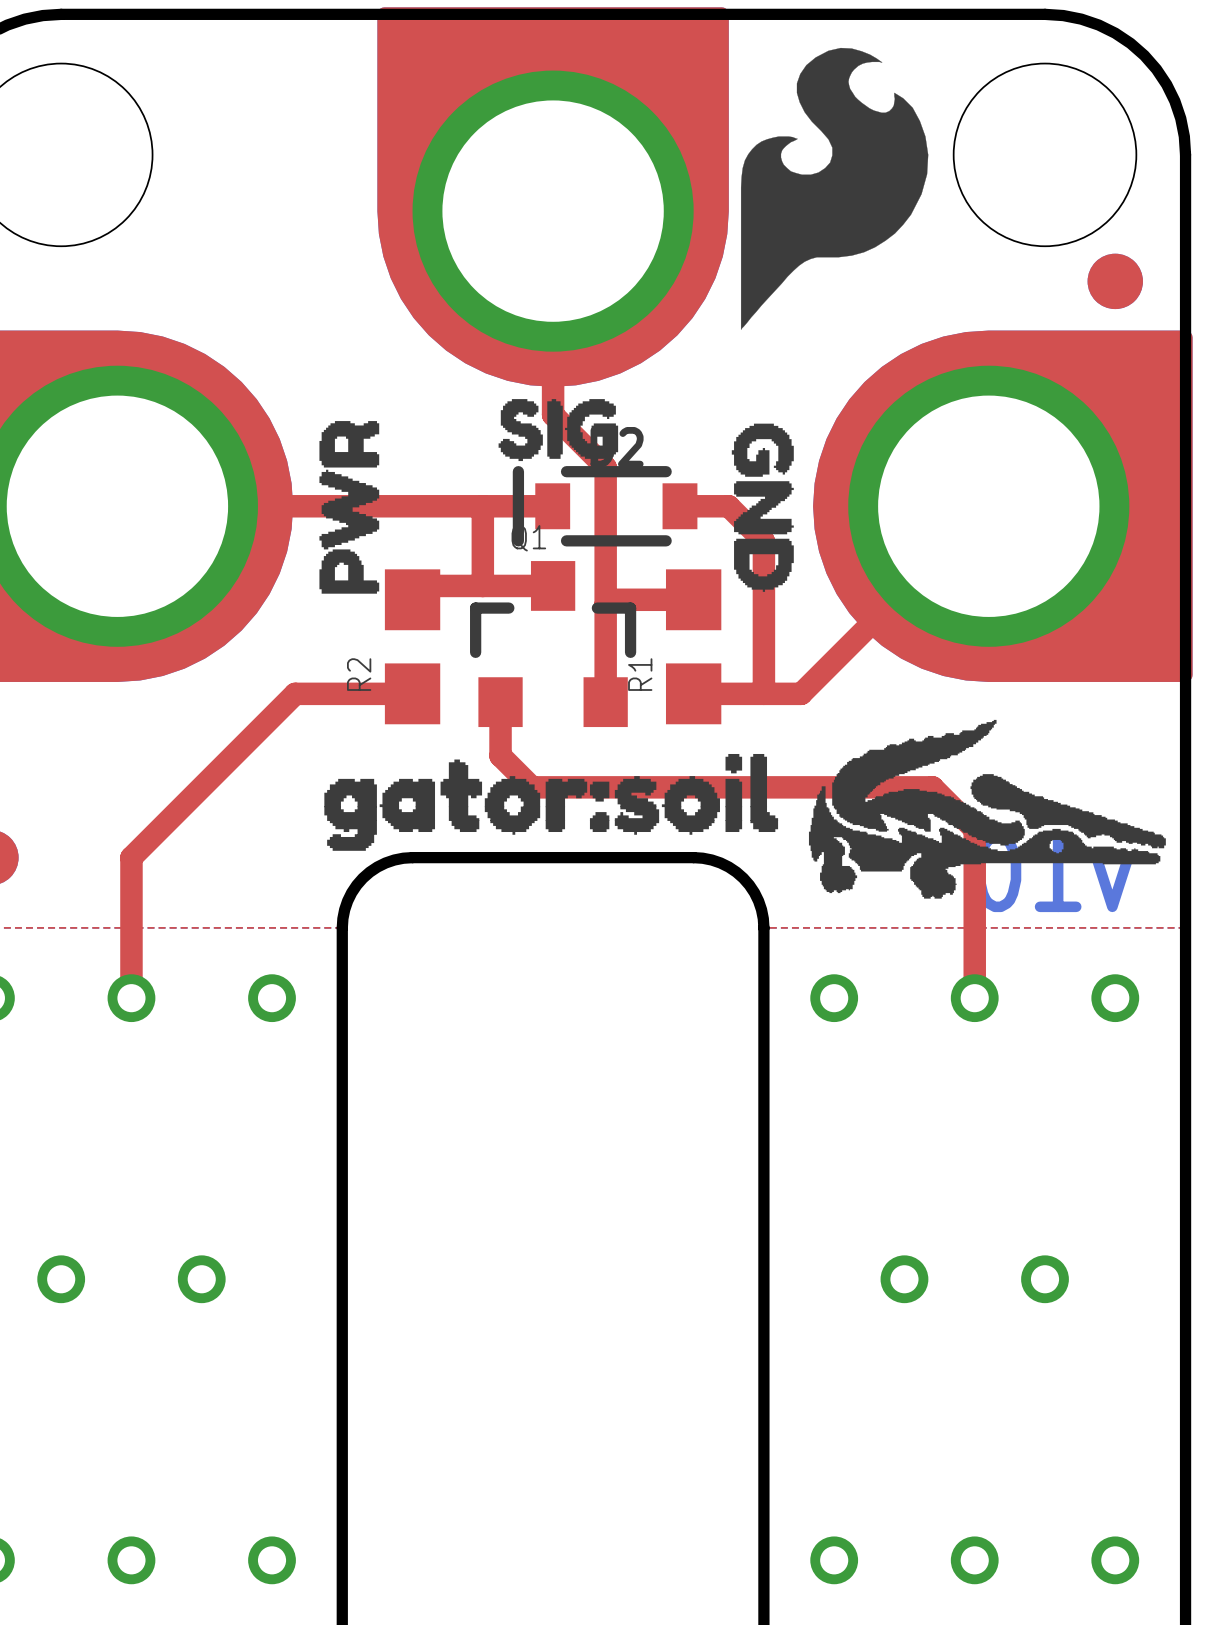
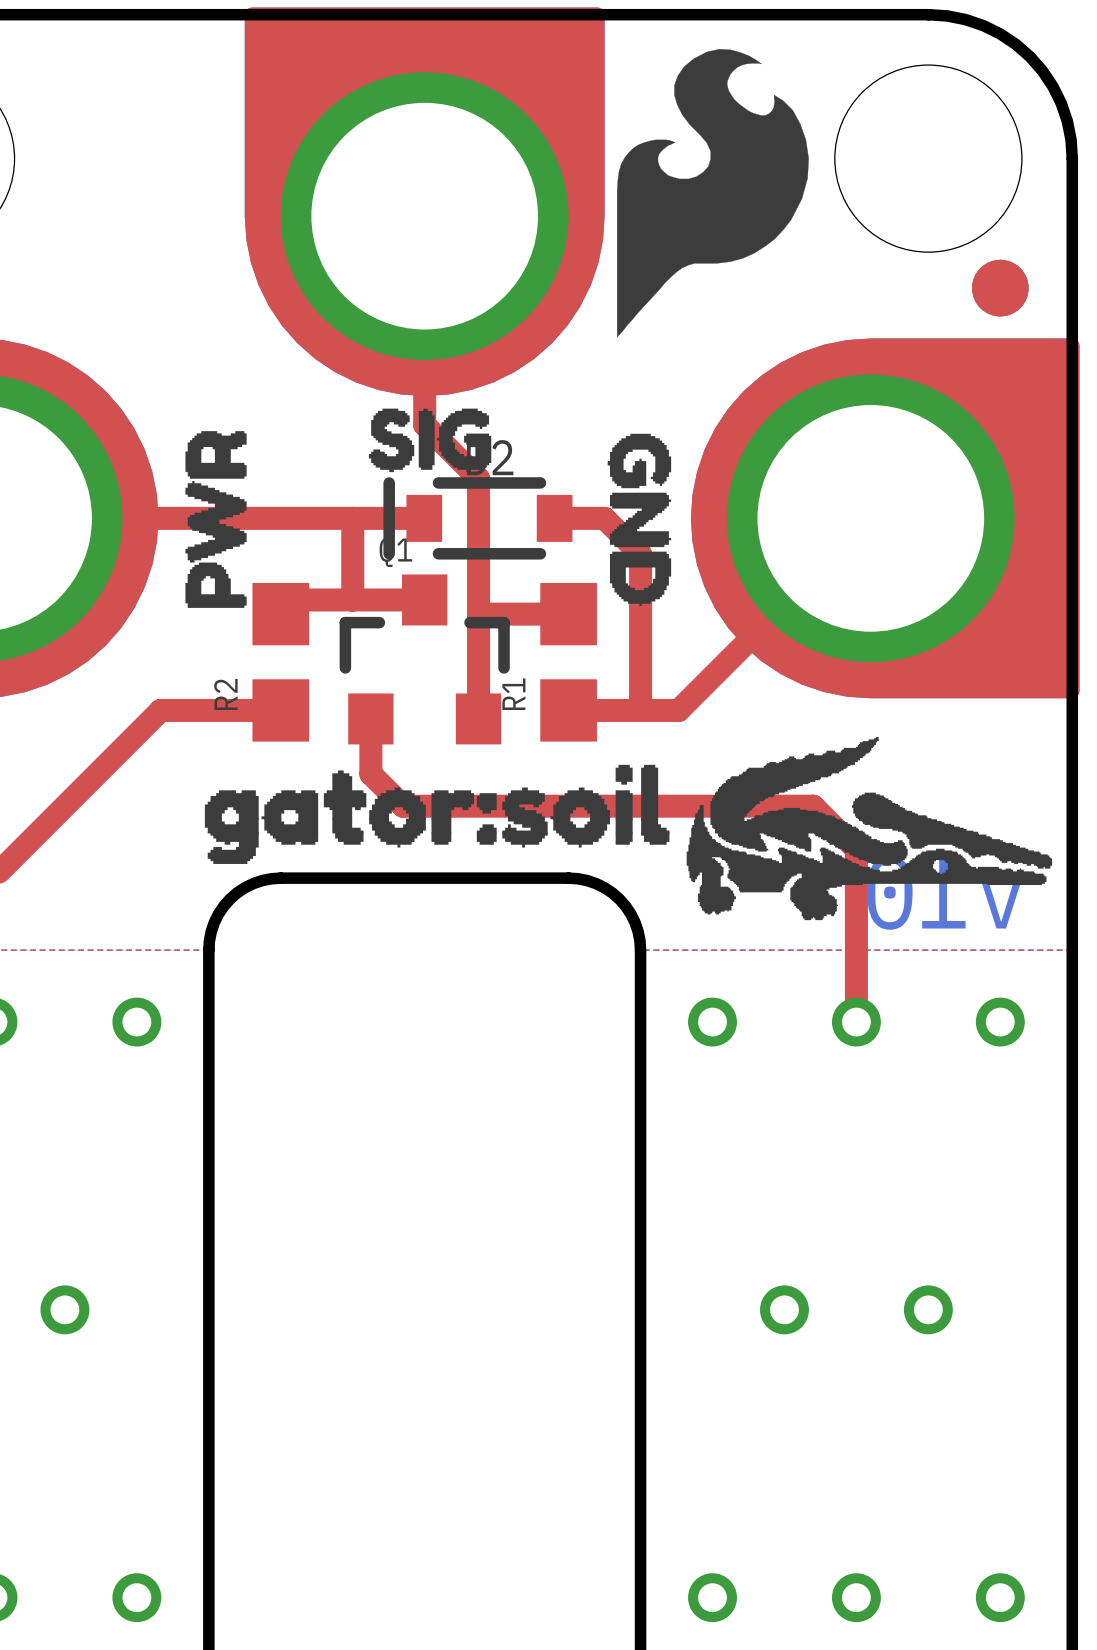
drawing position: (551, 802) -> (437, 814)

